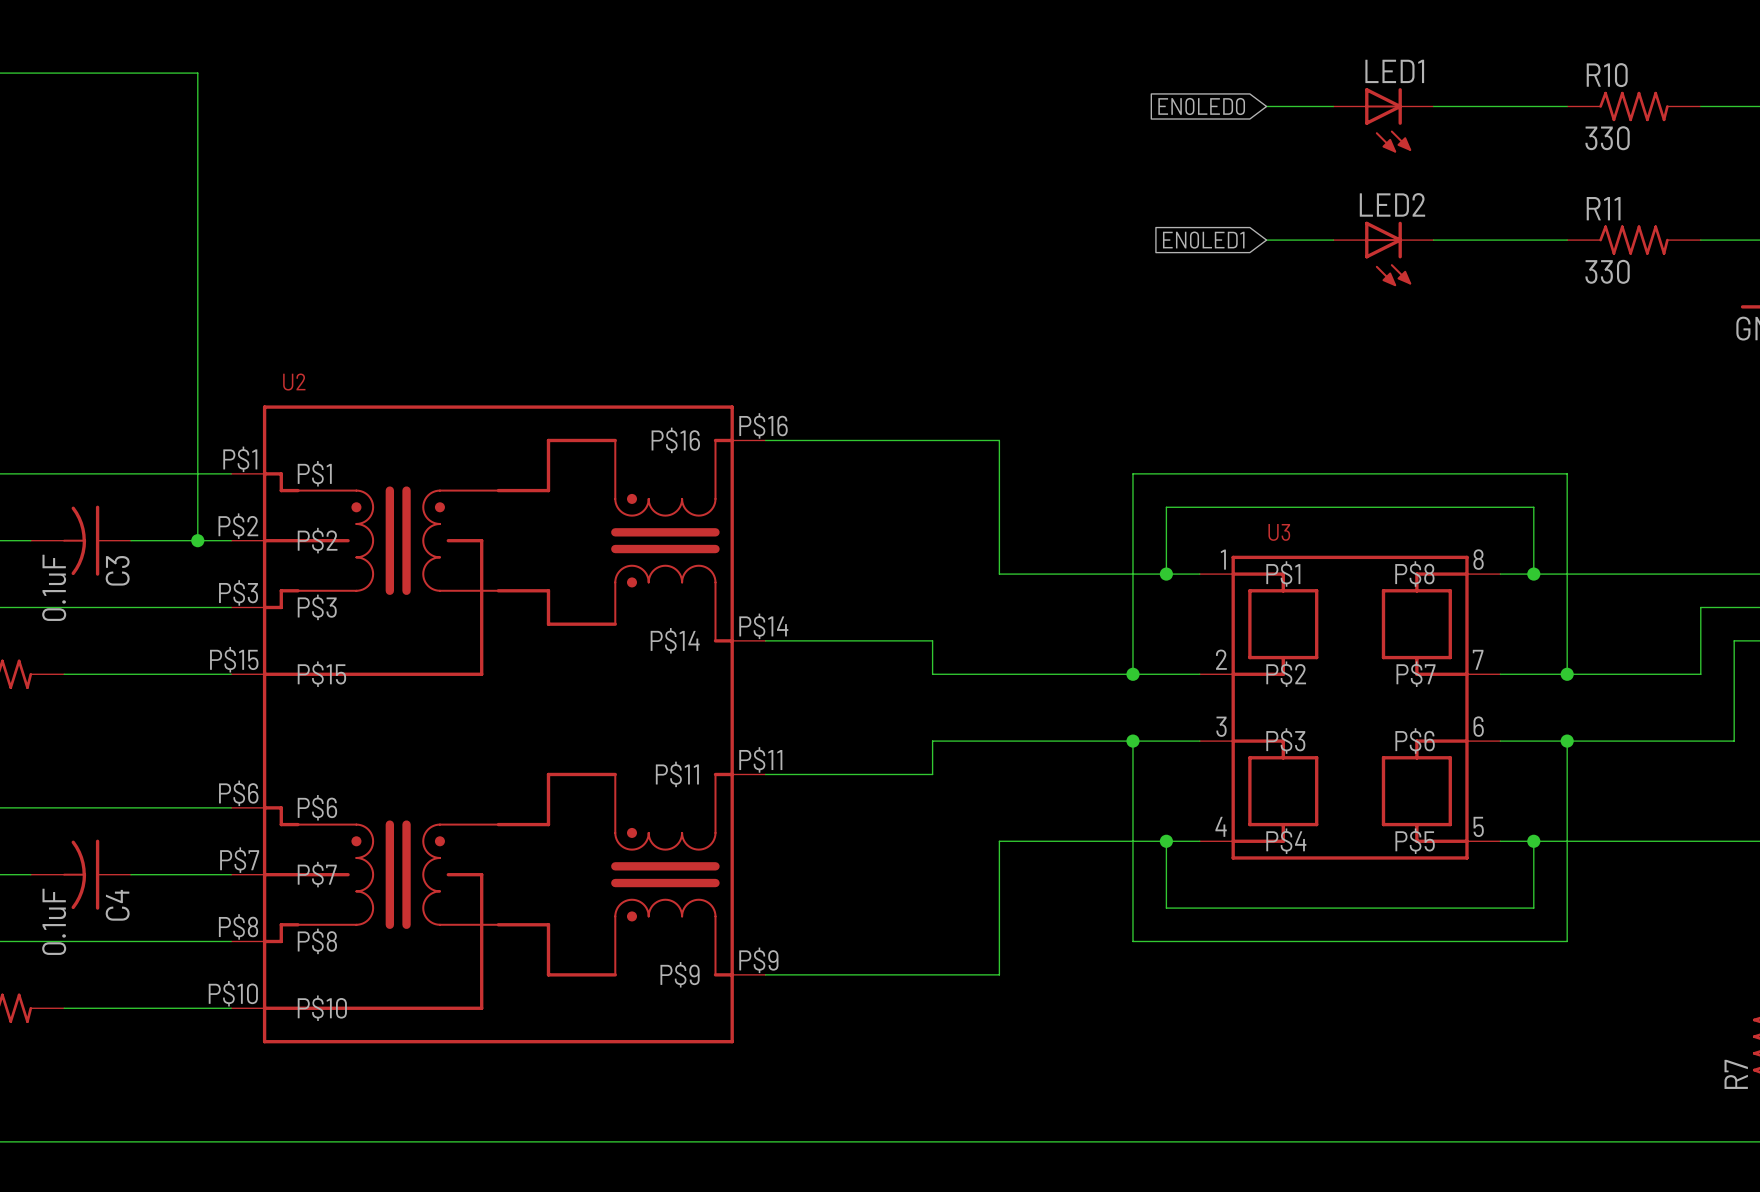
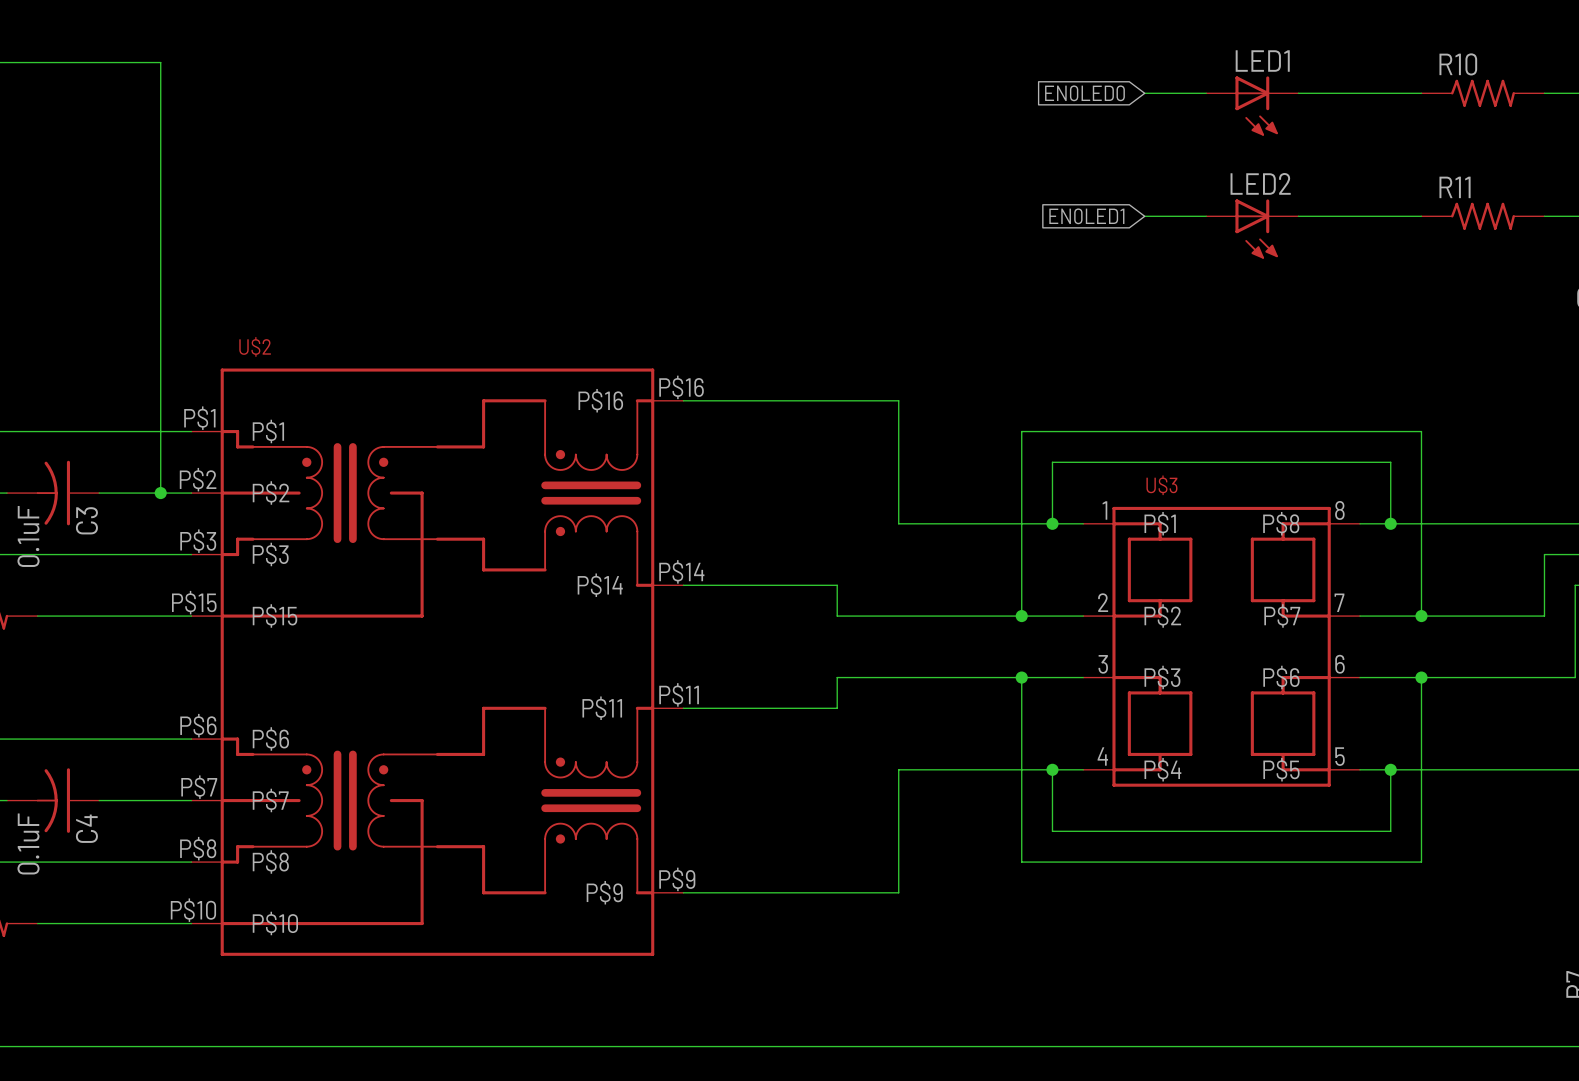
R10 value: 330 (1607, 138) -> none
R11 value: 330 (1607, 271) -> none
U2 name: U2 (294, 382) -> U$2 (255, 346)
U3 name: U3 (1279, 532) -> U$3 (1161, 485)

